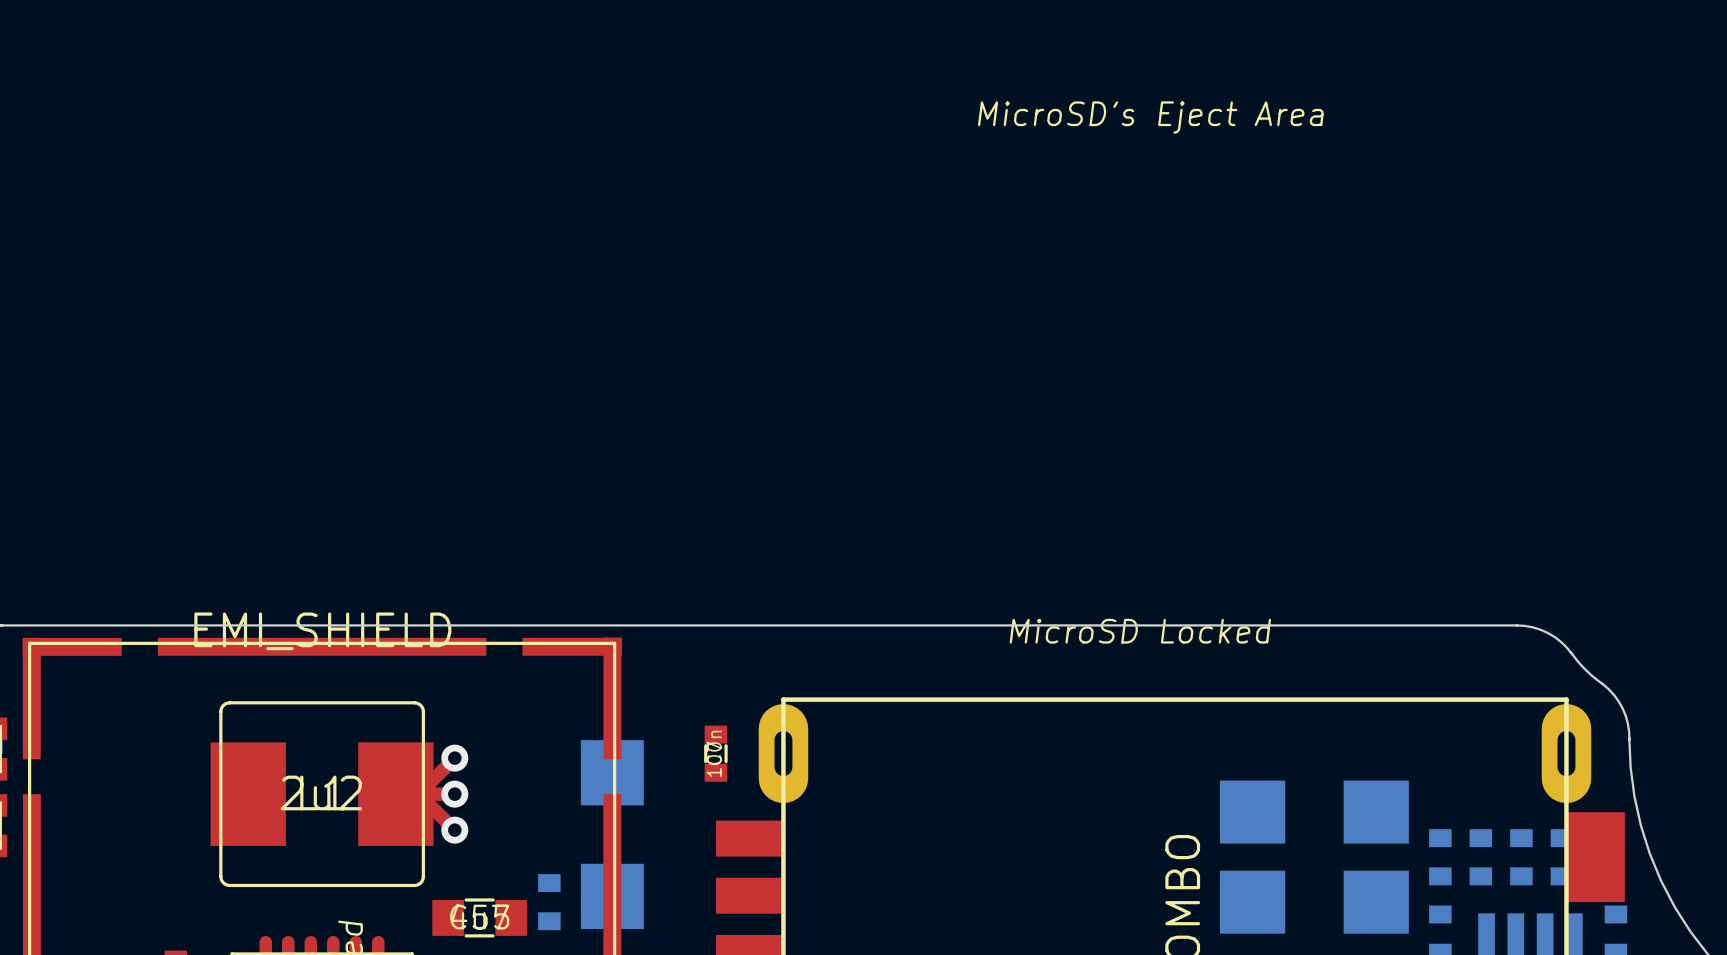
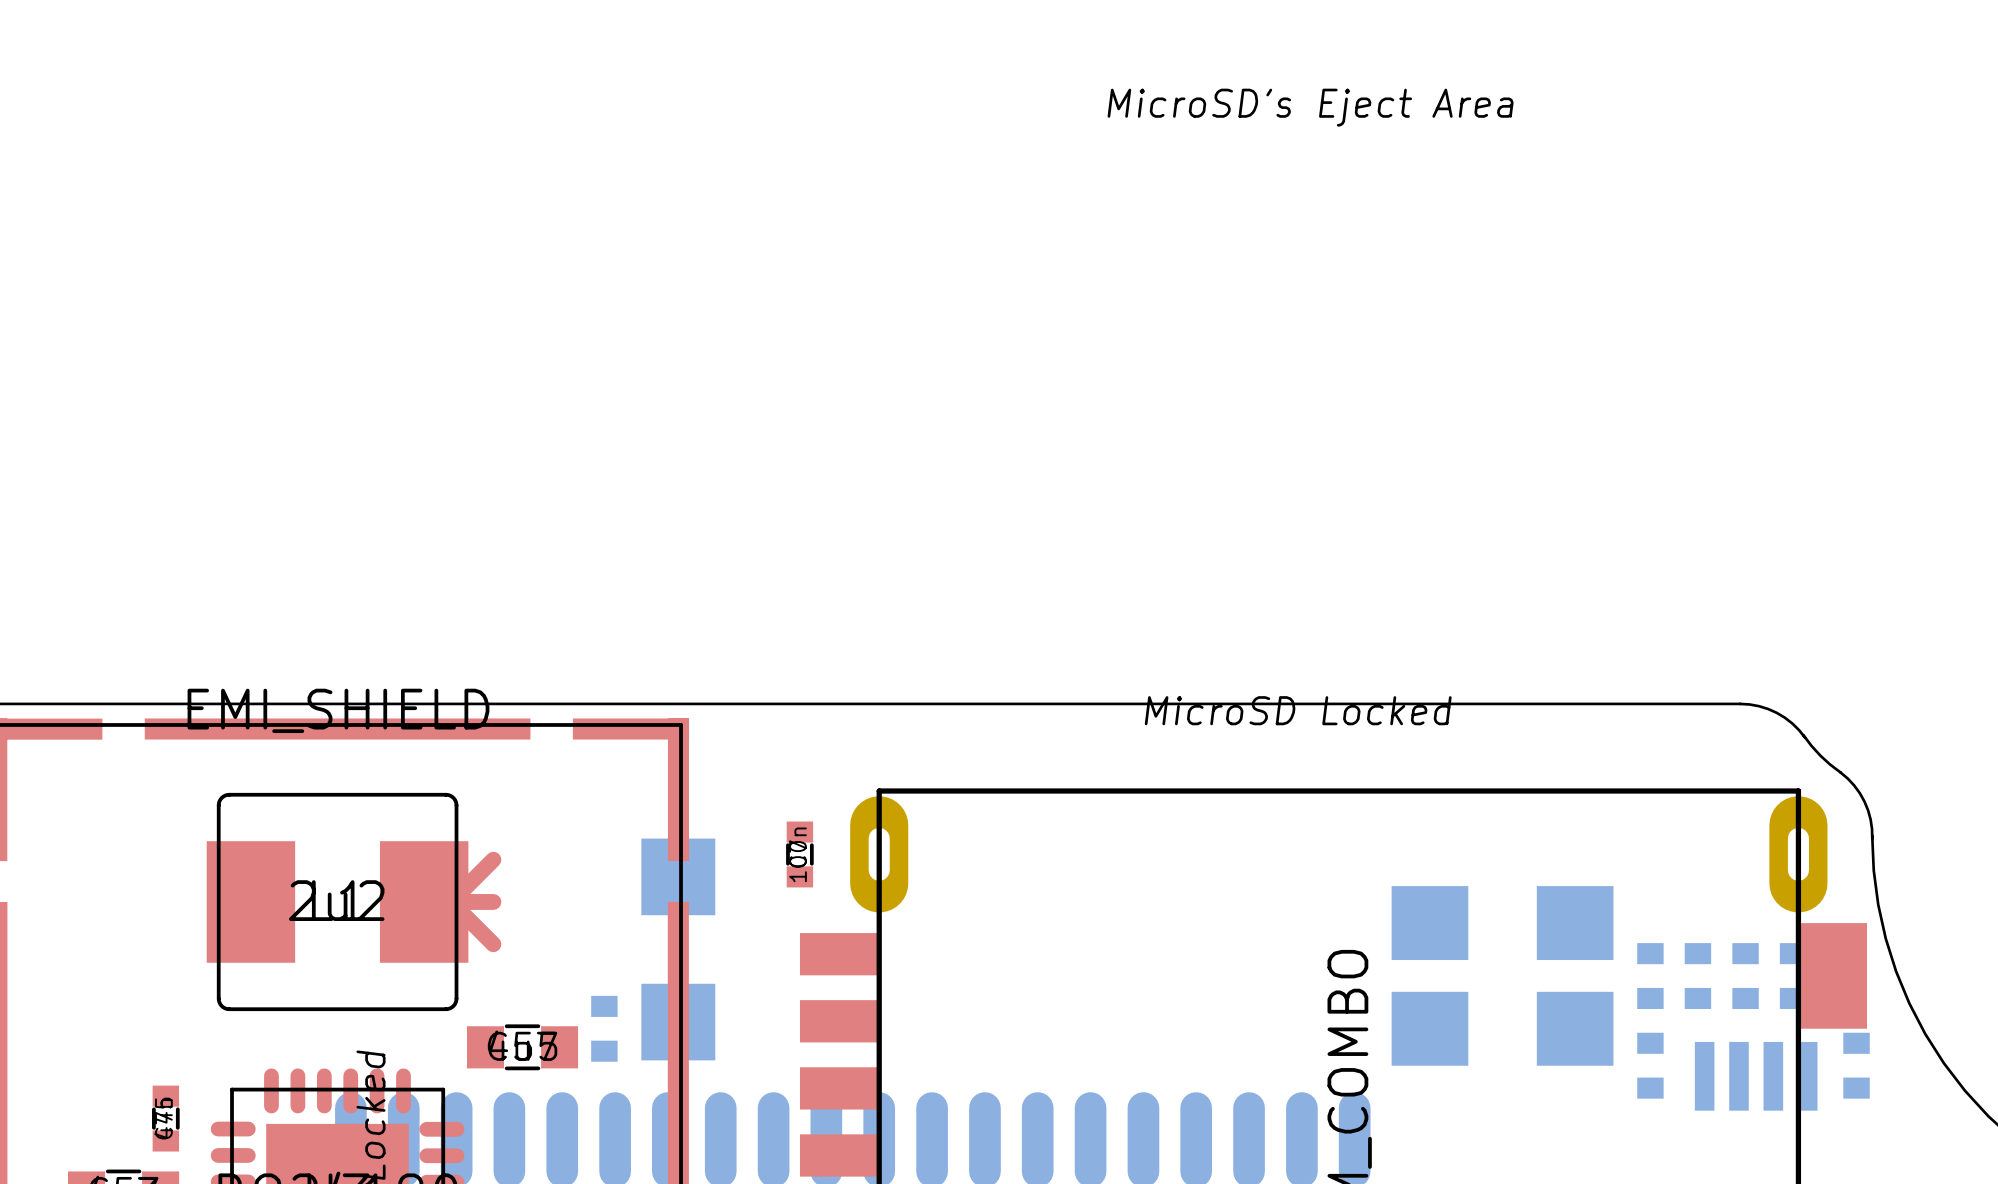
via: (454, 758) -> none
via: (454, 794) -> none
via: (454, 830) -> none

